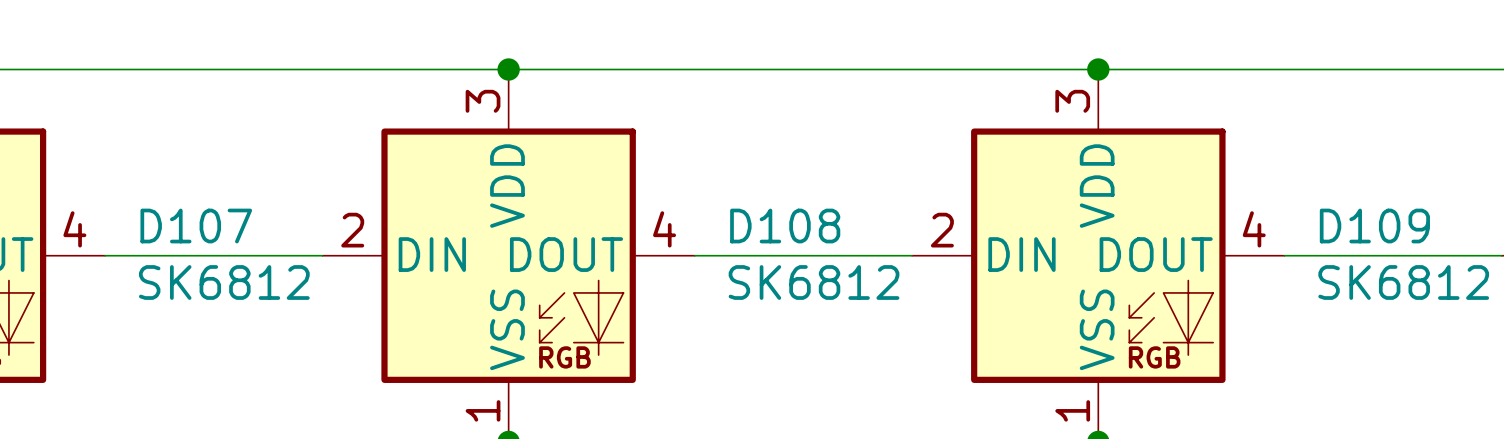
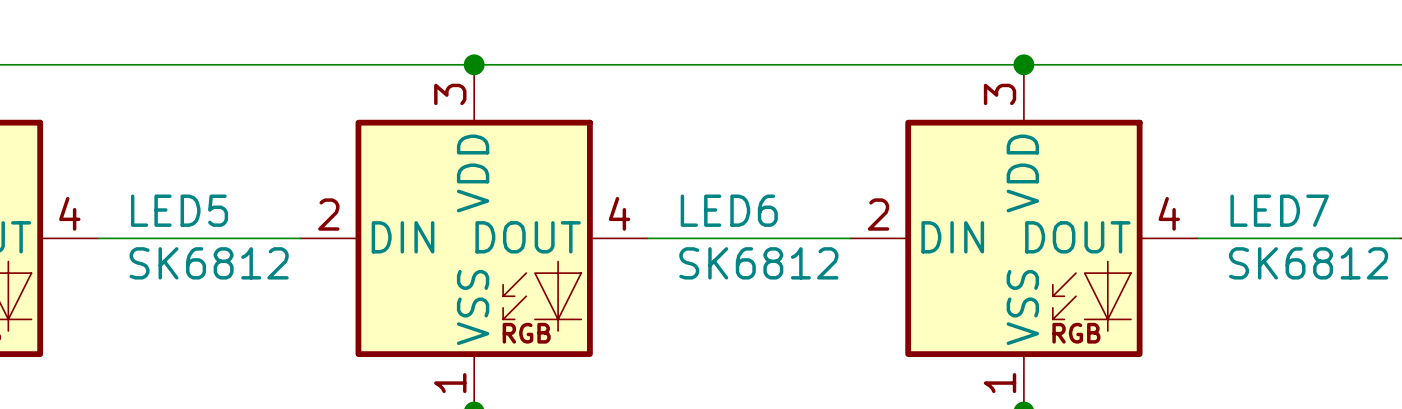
D107 name: D107 (196, 226) -> LED5 (179, 210)
D108 name: D108 (785, 226) -> LED6 (729, 210)
D109 name: D109 (1374, 226) -> LED7 (1279, 210)

